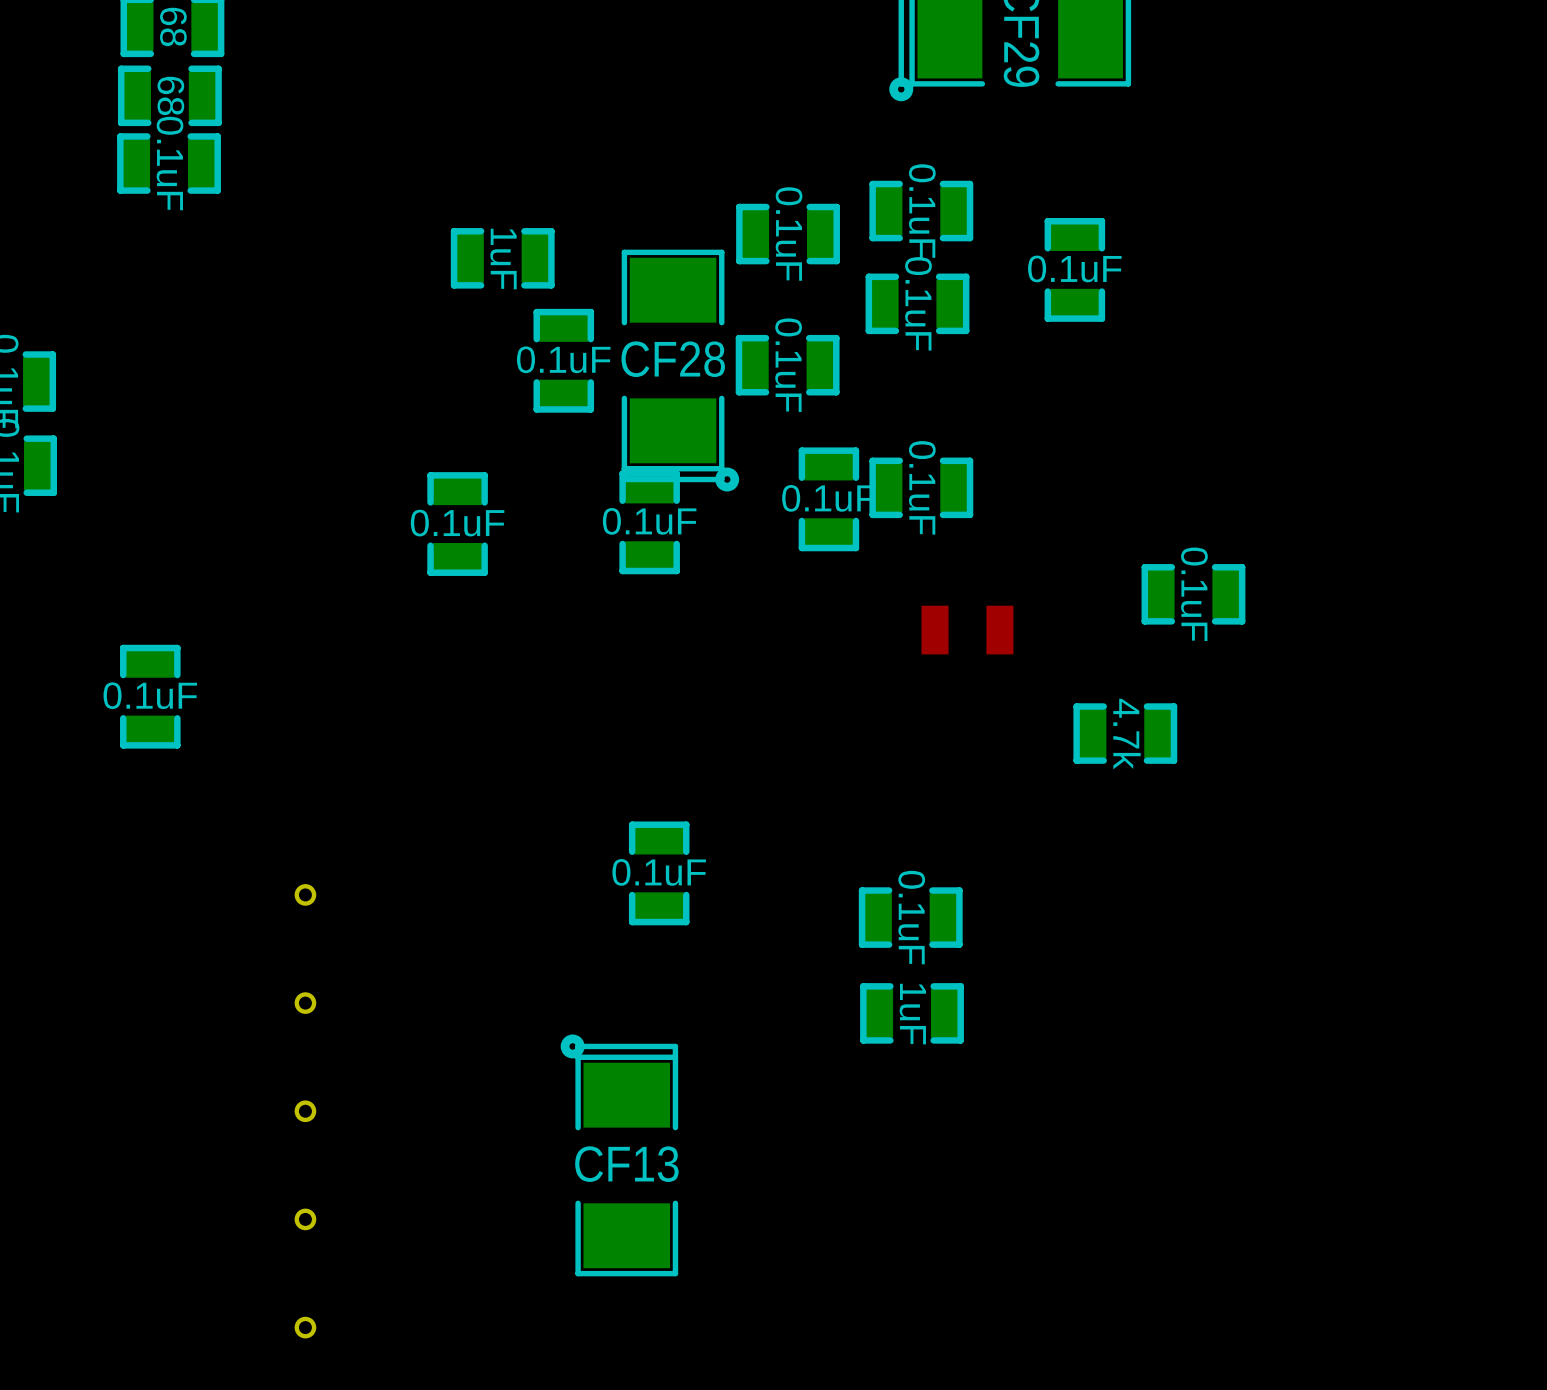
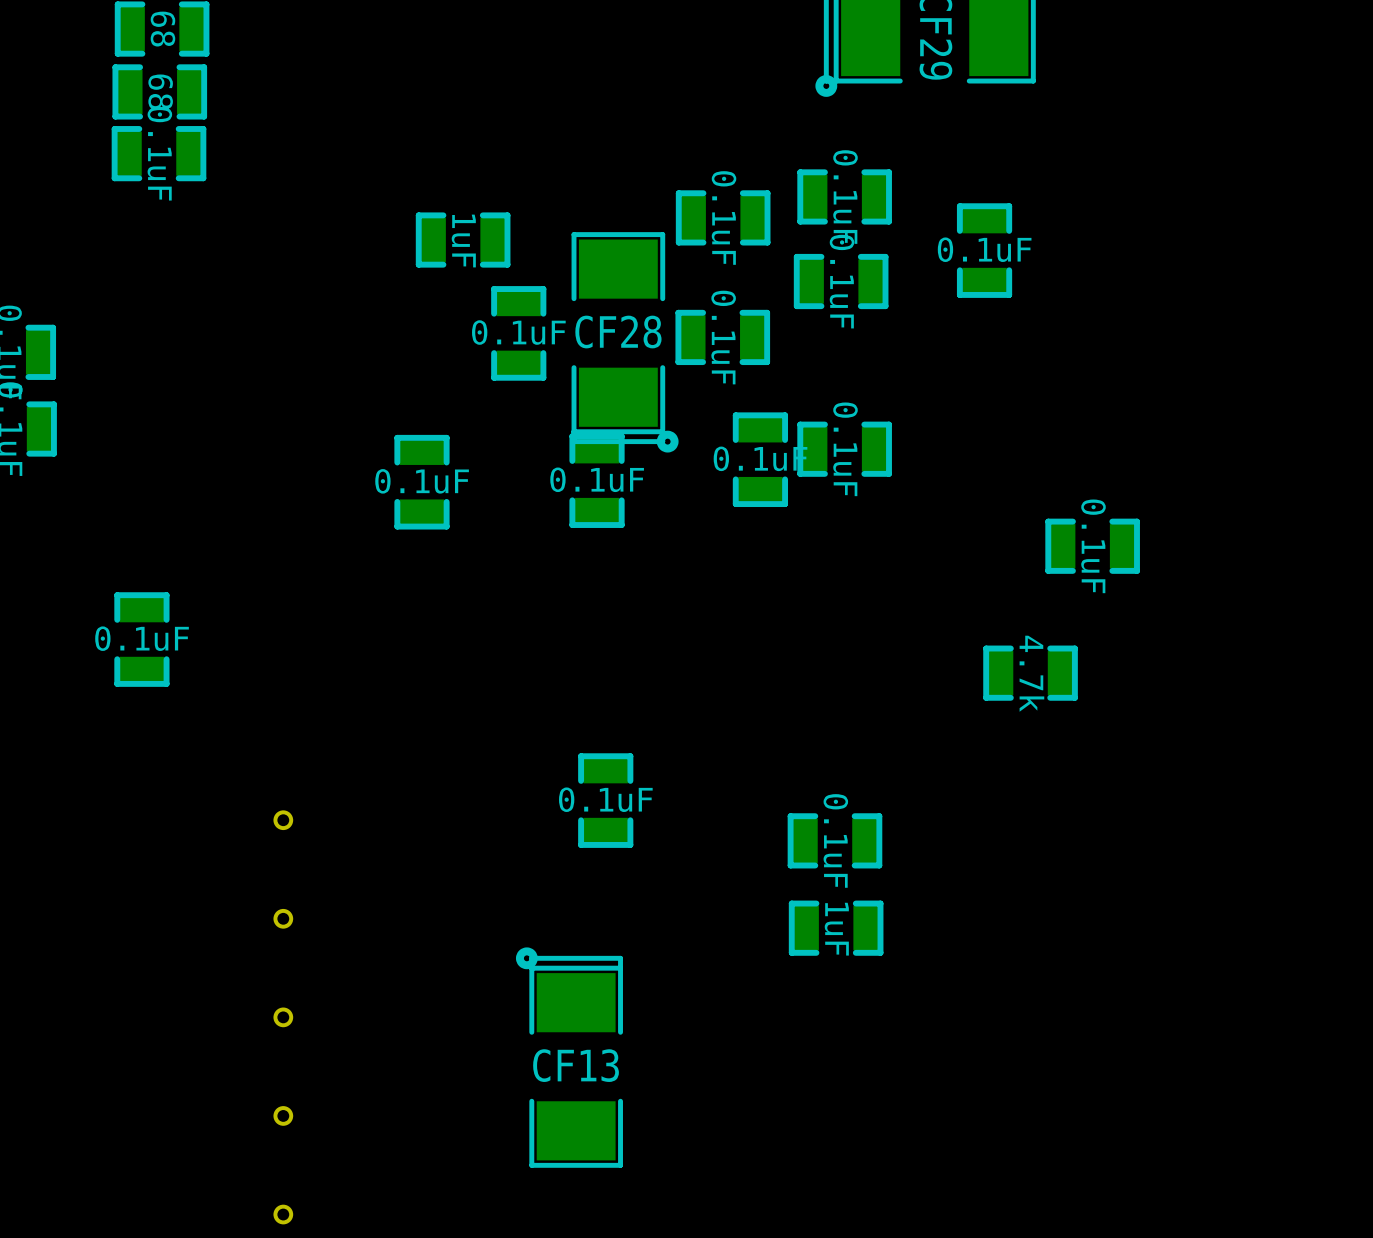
part: (967, 630) -> none

